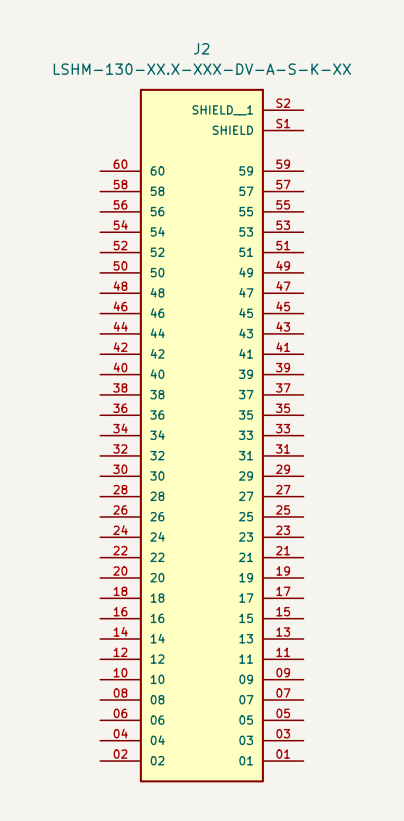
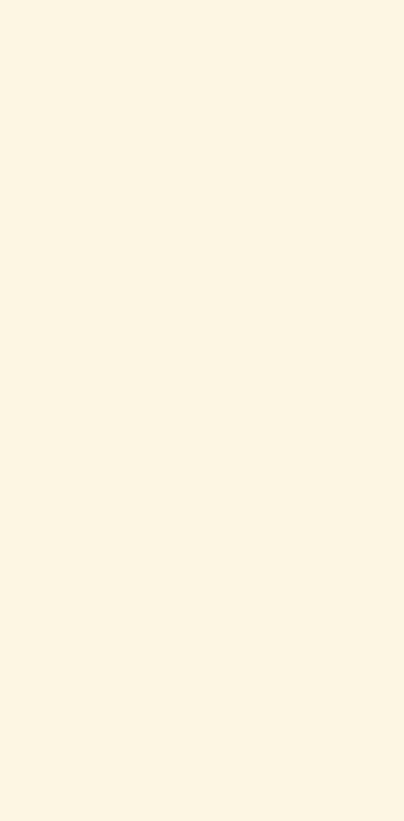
J2: LSHM-130-XX.X-XXX-DV-A-S-K-XX (201, 435) -> none

